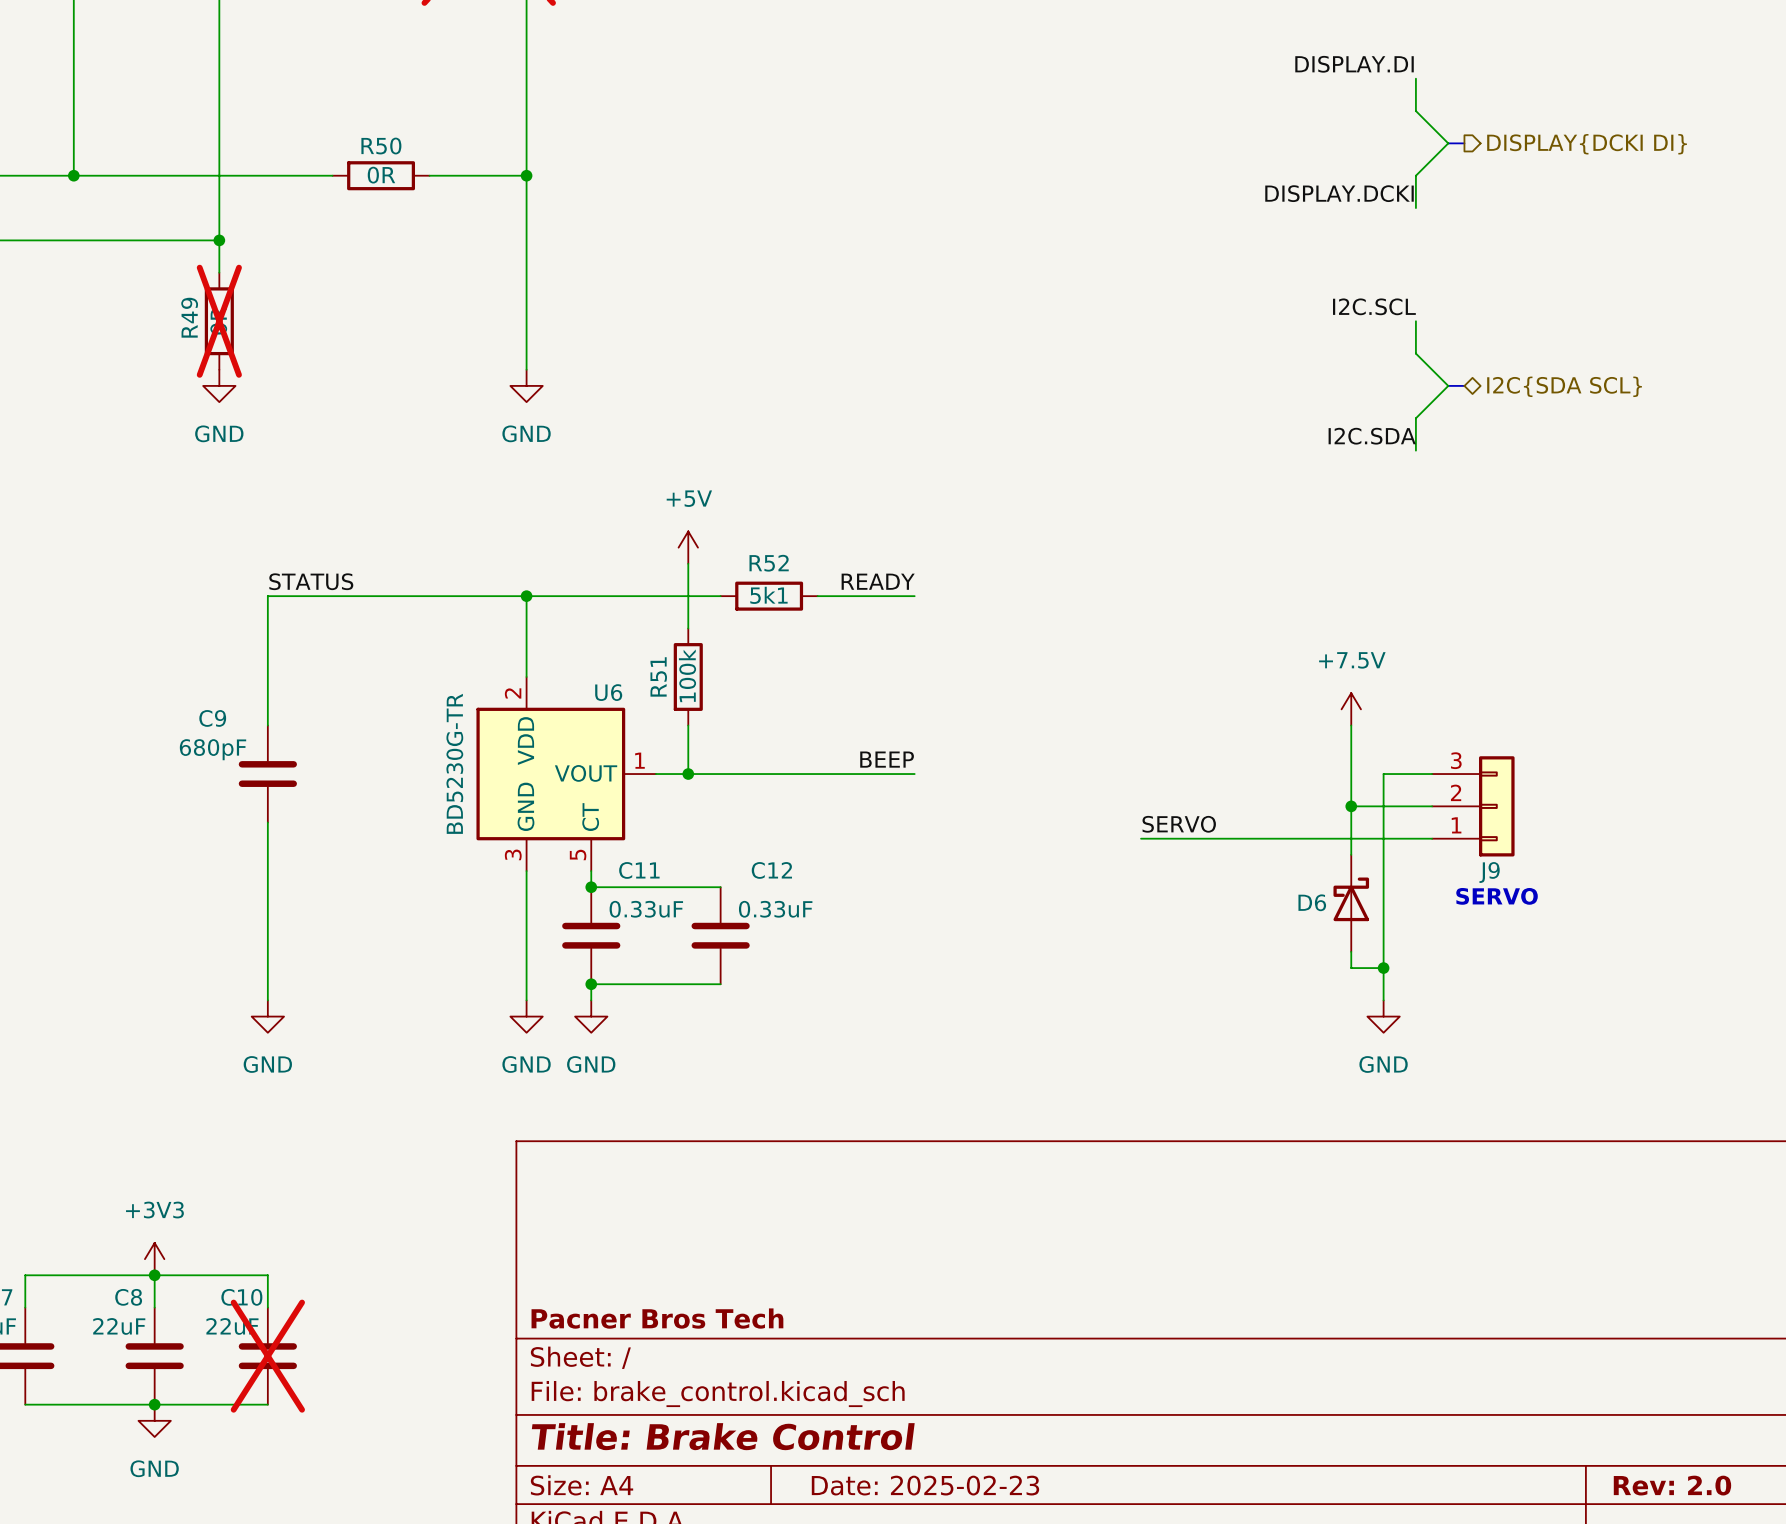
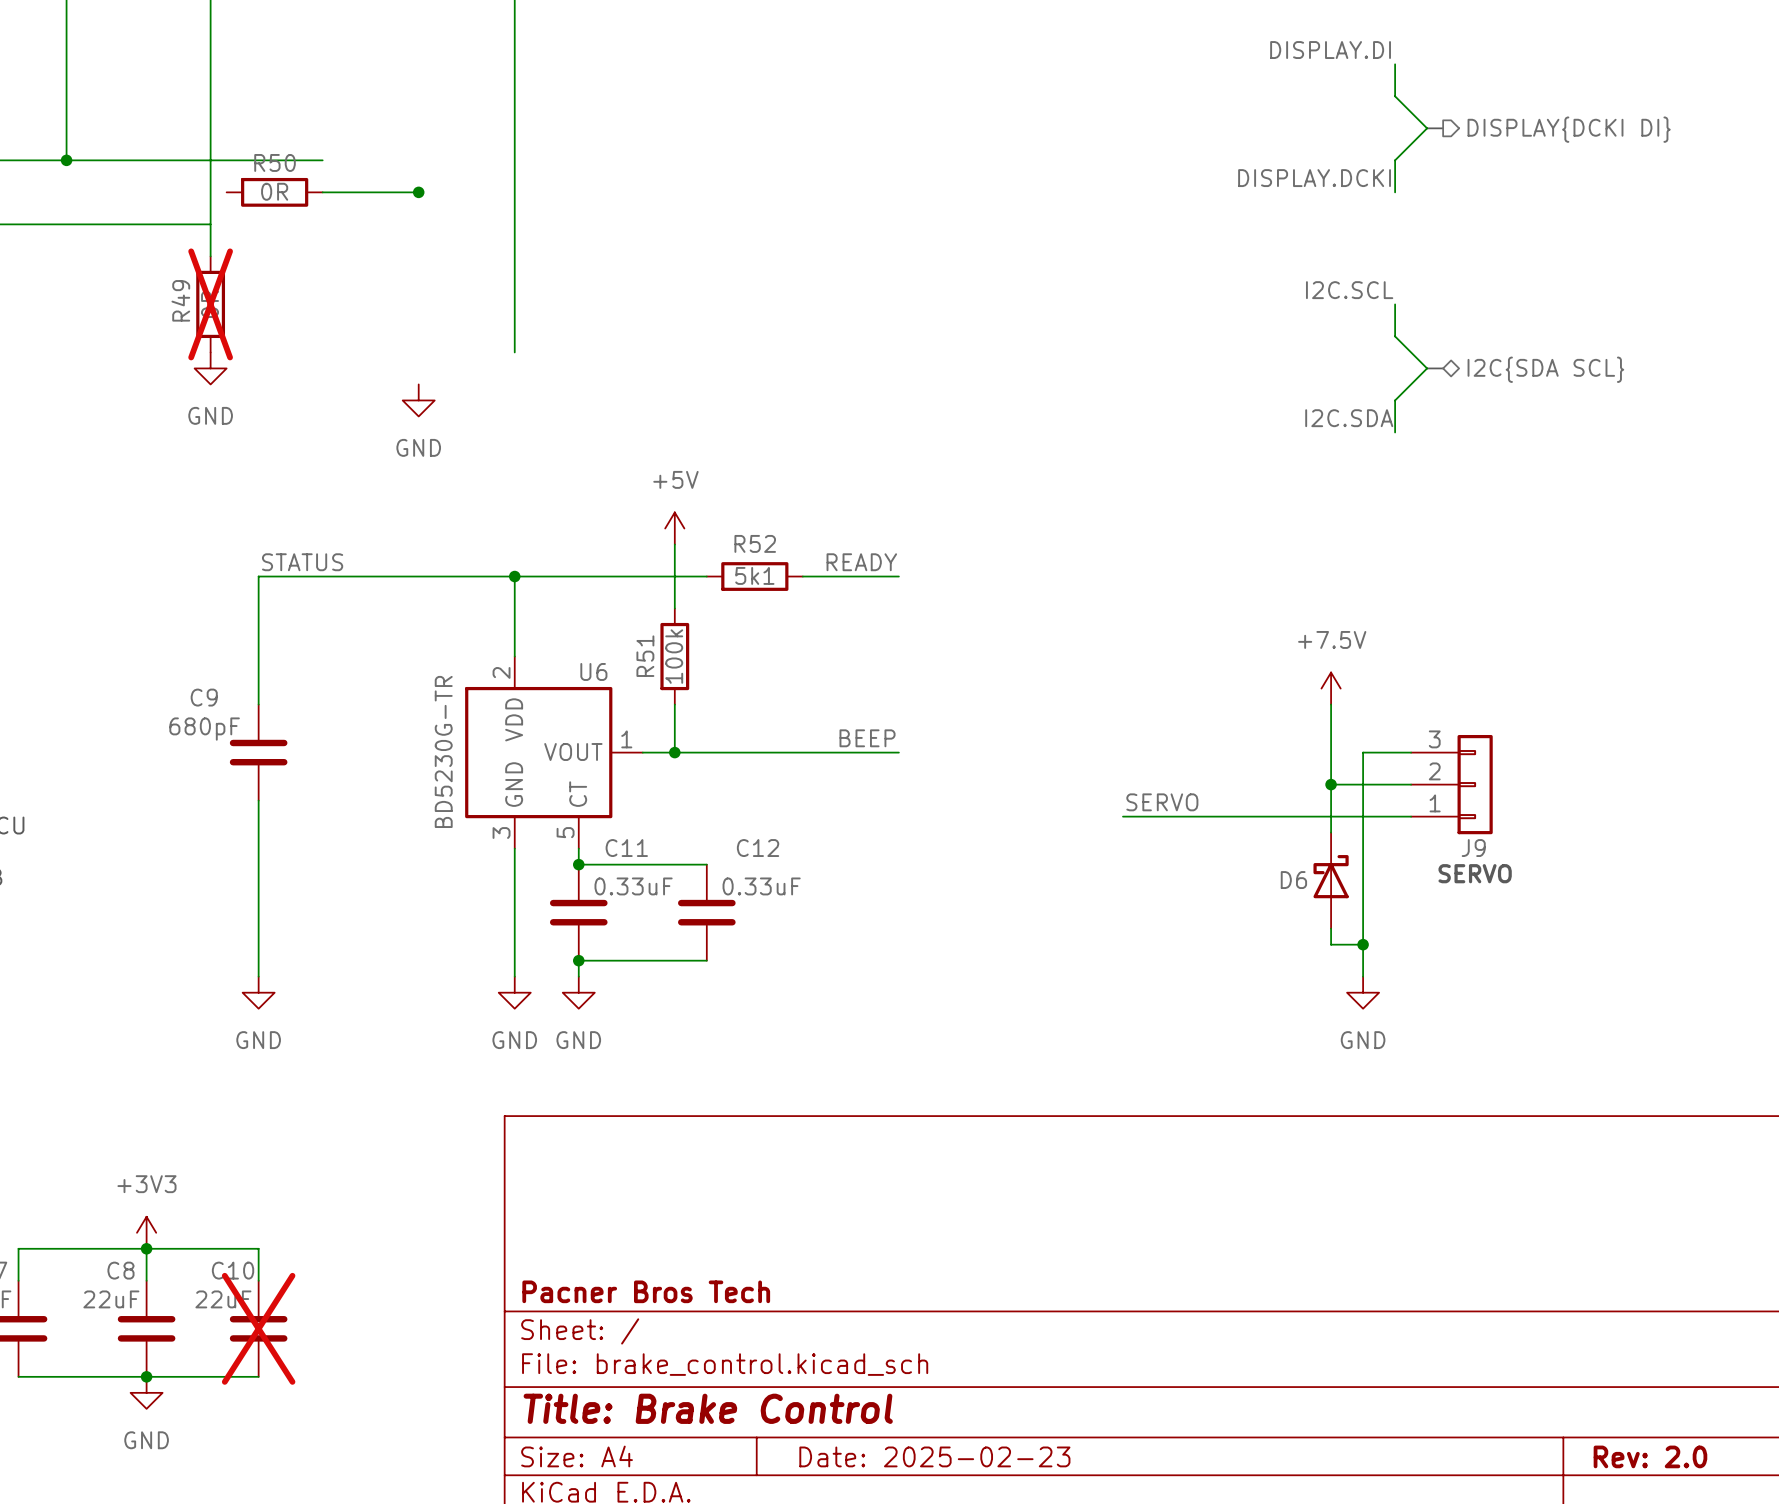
R50 position: (381, 175) -> (274, 192)
wire: (429, 175) (526, 175) -> (322, 192) (418, 192)
junction: (526, 175) -> none
junction: none -> (418, 192)
junction: (219, 240) -> none
power symbol position: GND (526, 385) -> GND (418, 400)

